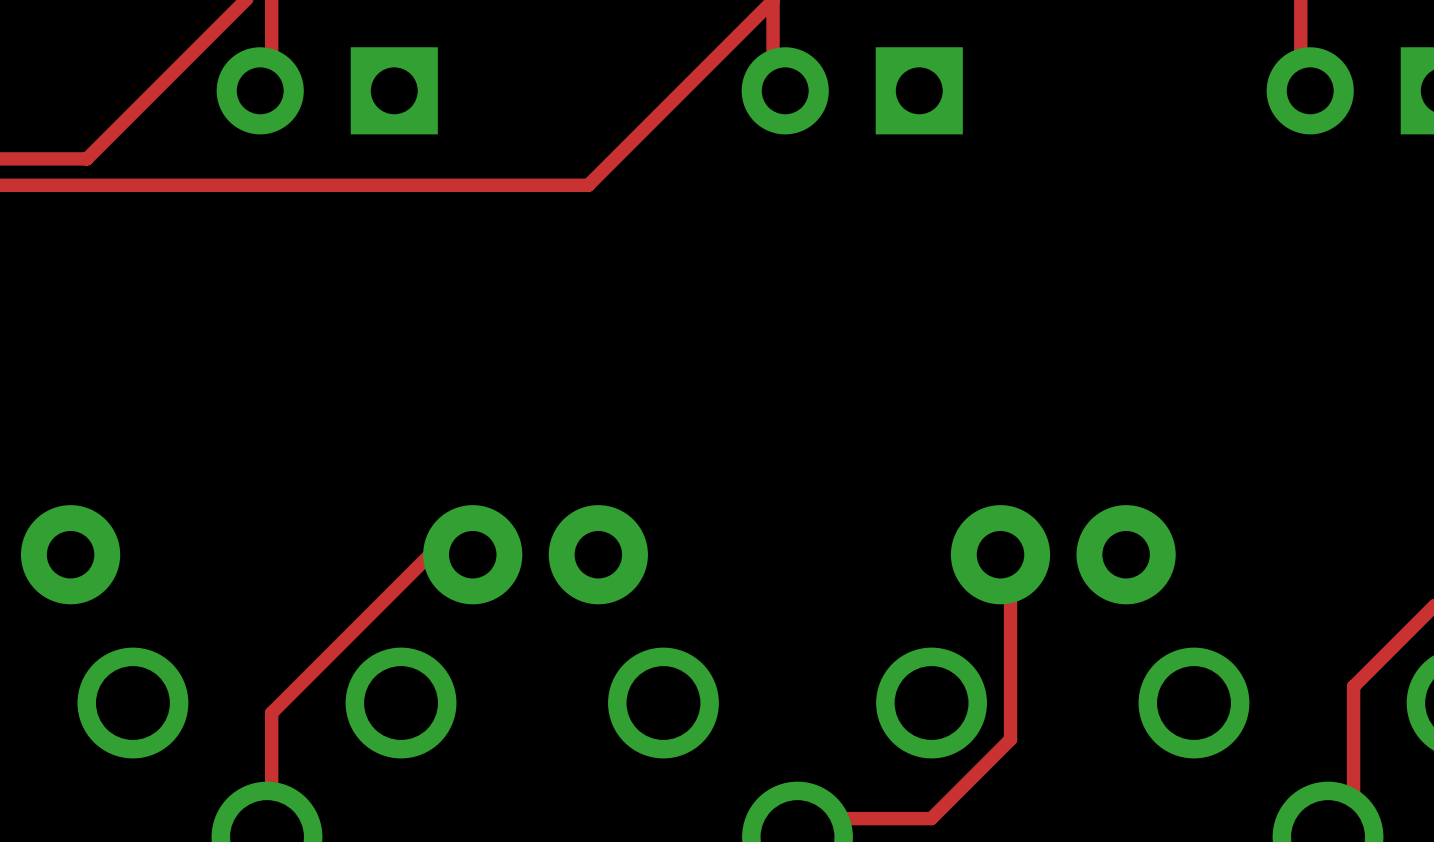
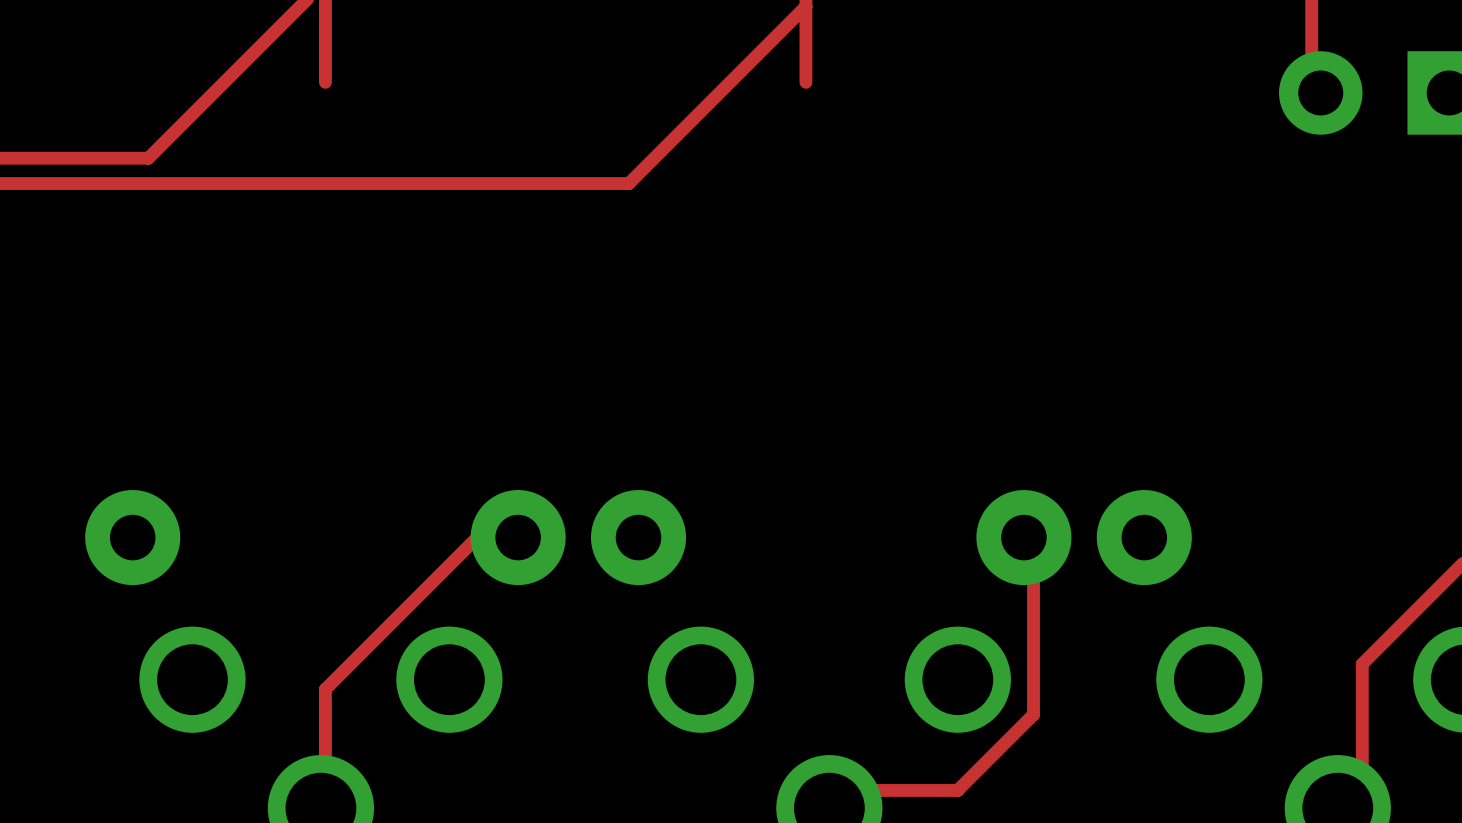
part: (327, 90) -> none
part: (852, 90) -> none

